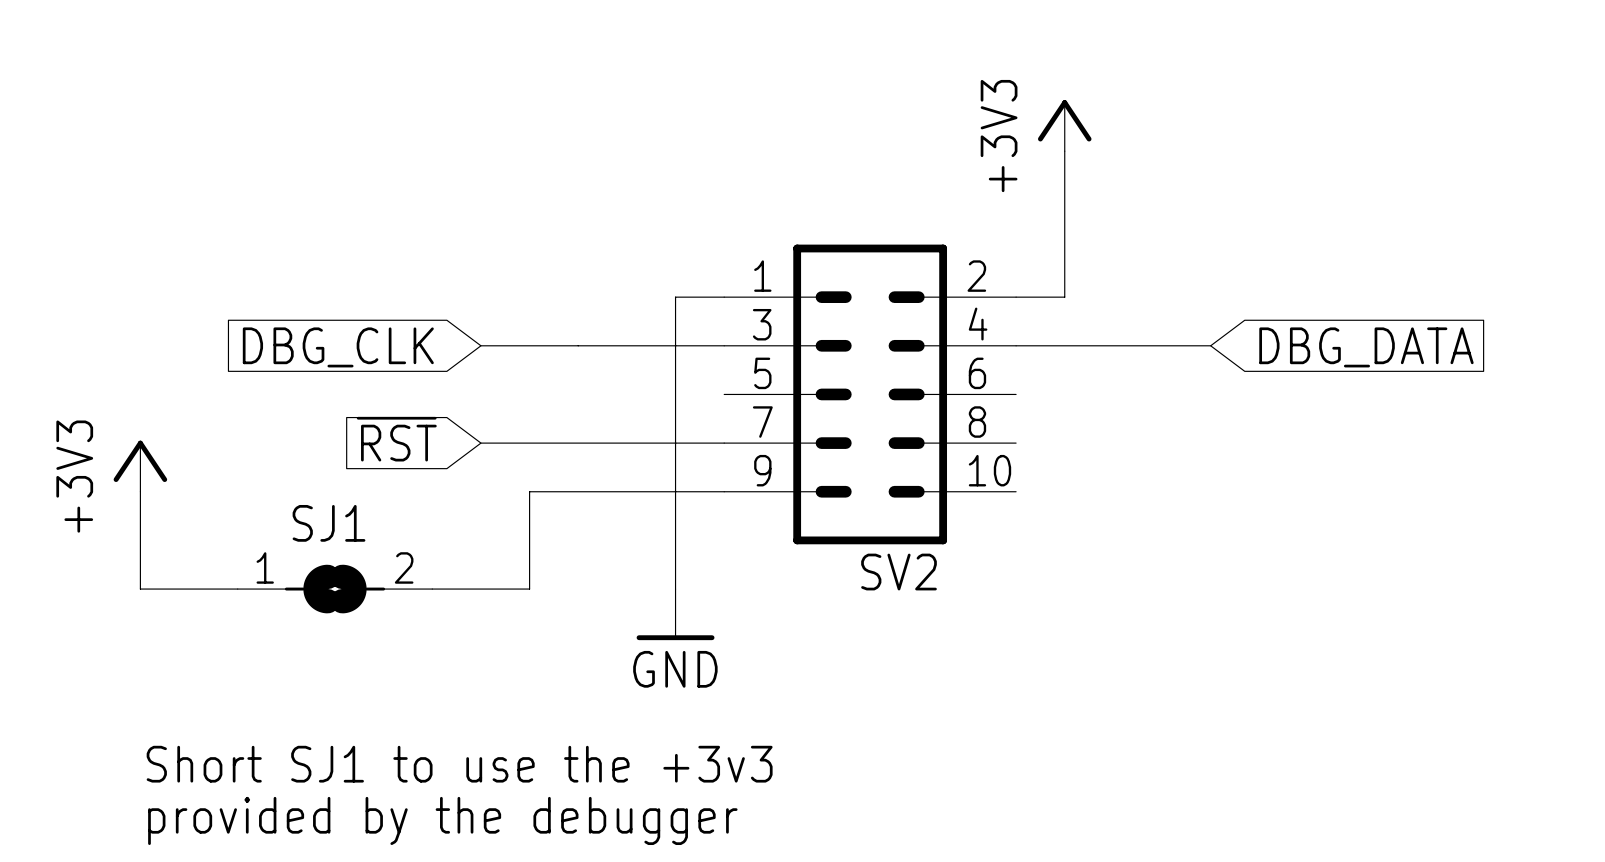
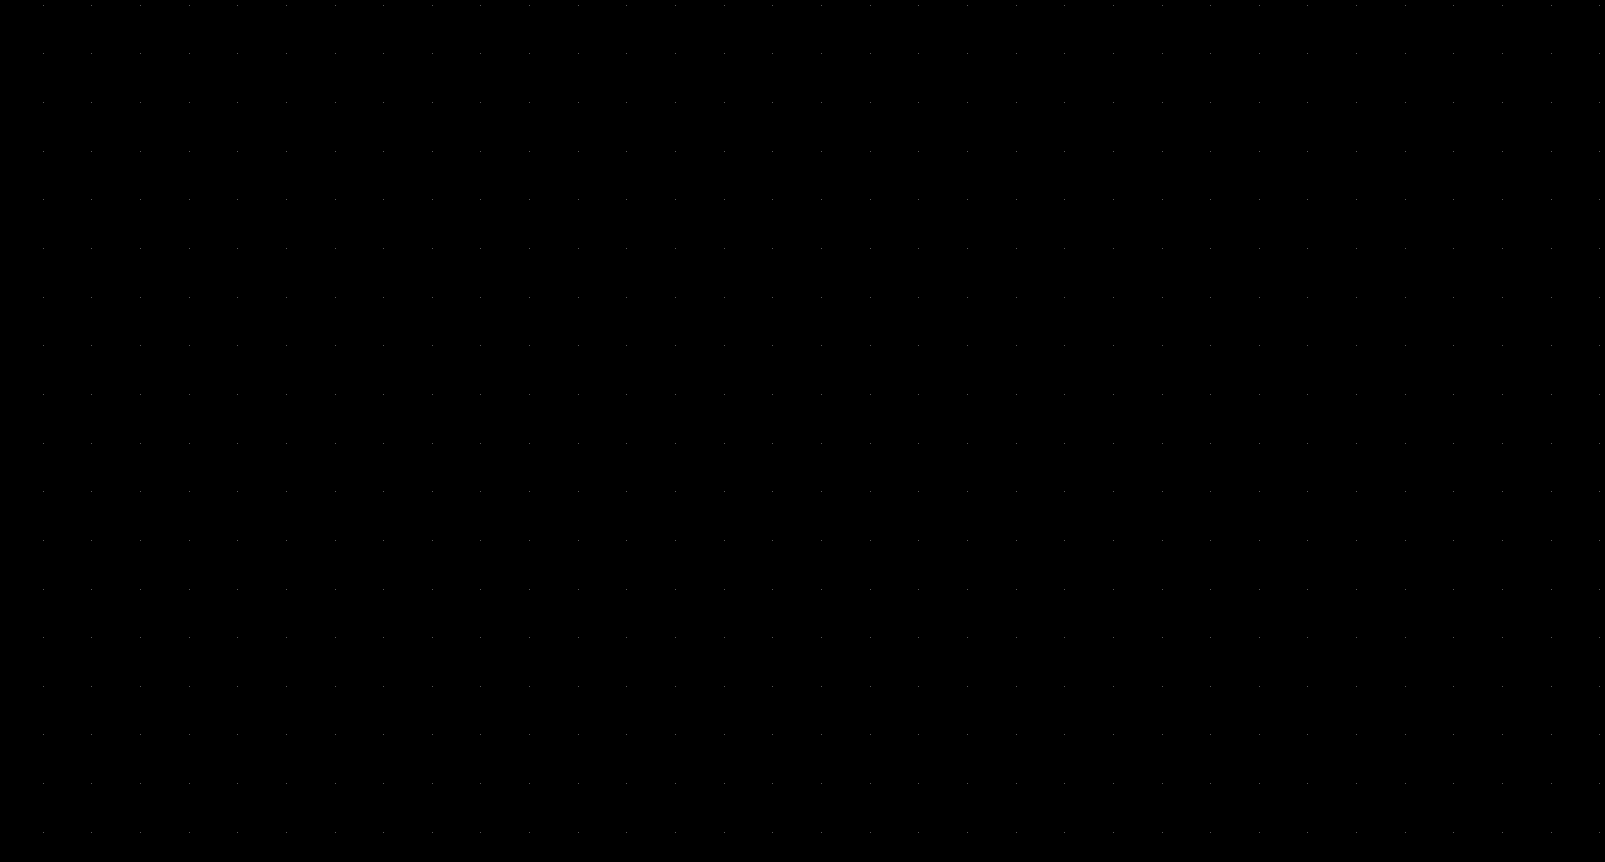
power symbol: +3V3 (1064, 125) -> none
wire: (1064, 151) (1064, 297) (1016, 297) -> none
wire: (724, 297) (675, 297) (675, 589) -> none
wire: (480, 345) (724, 345) -> none
wire: (1016, 345) (1210, 345) -> none
global label: DBG_CLK (338, 347) -> none
global label: DBG_DATA (1366, 347) -> none
SV2: (870, 394) -> none
global label: ~{RST} (396, 439) -> none
wire: (480, 443) (724, 443) -> none
power symbol: +3V3 (140, 466) -> none
wire: (140, 491) (140, 589) (237, 589) -> none
wire: (724, 491) (529, 491) (529, 589) (432, 589) -> none
SJ1: (335, 589) -> none
power symbol: GND (675, 614) -> none
text: Short SJ1 to use the +3v3 (459, 764) -> none
text: provided by the debugger (442, 820) -> none

